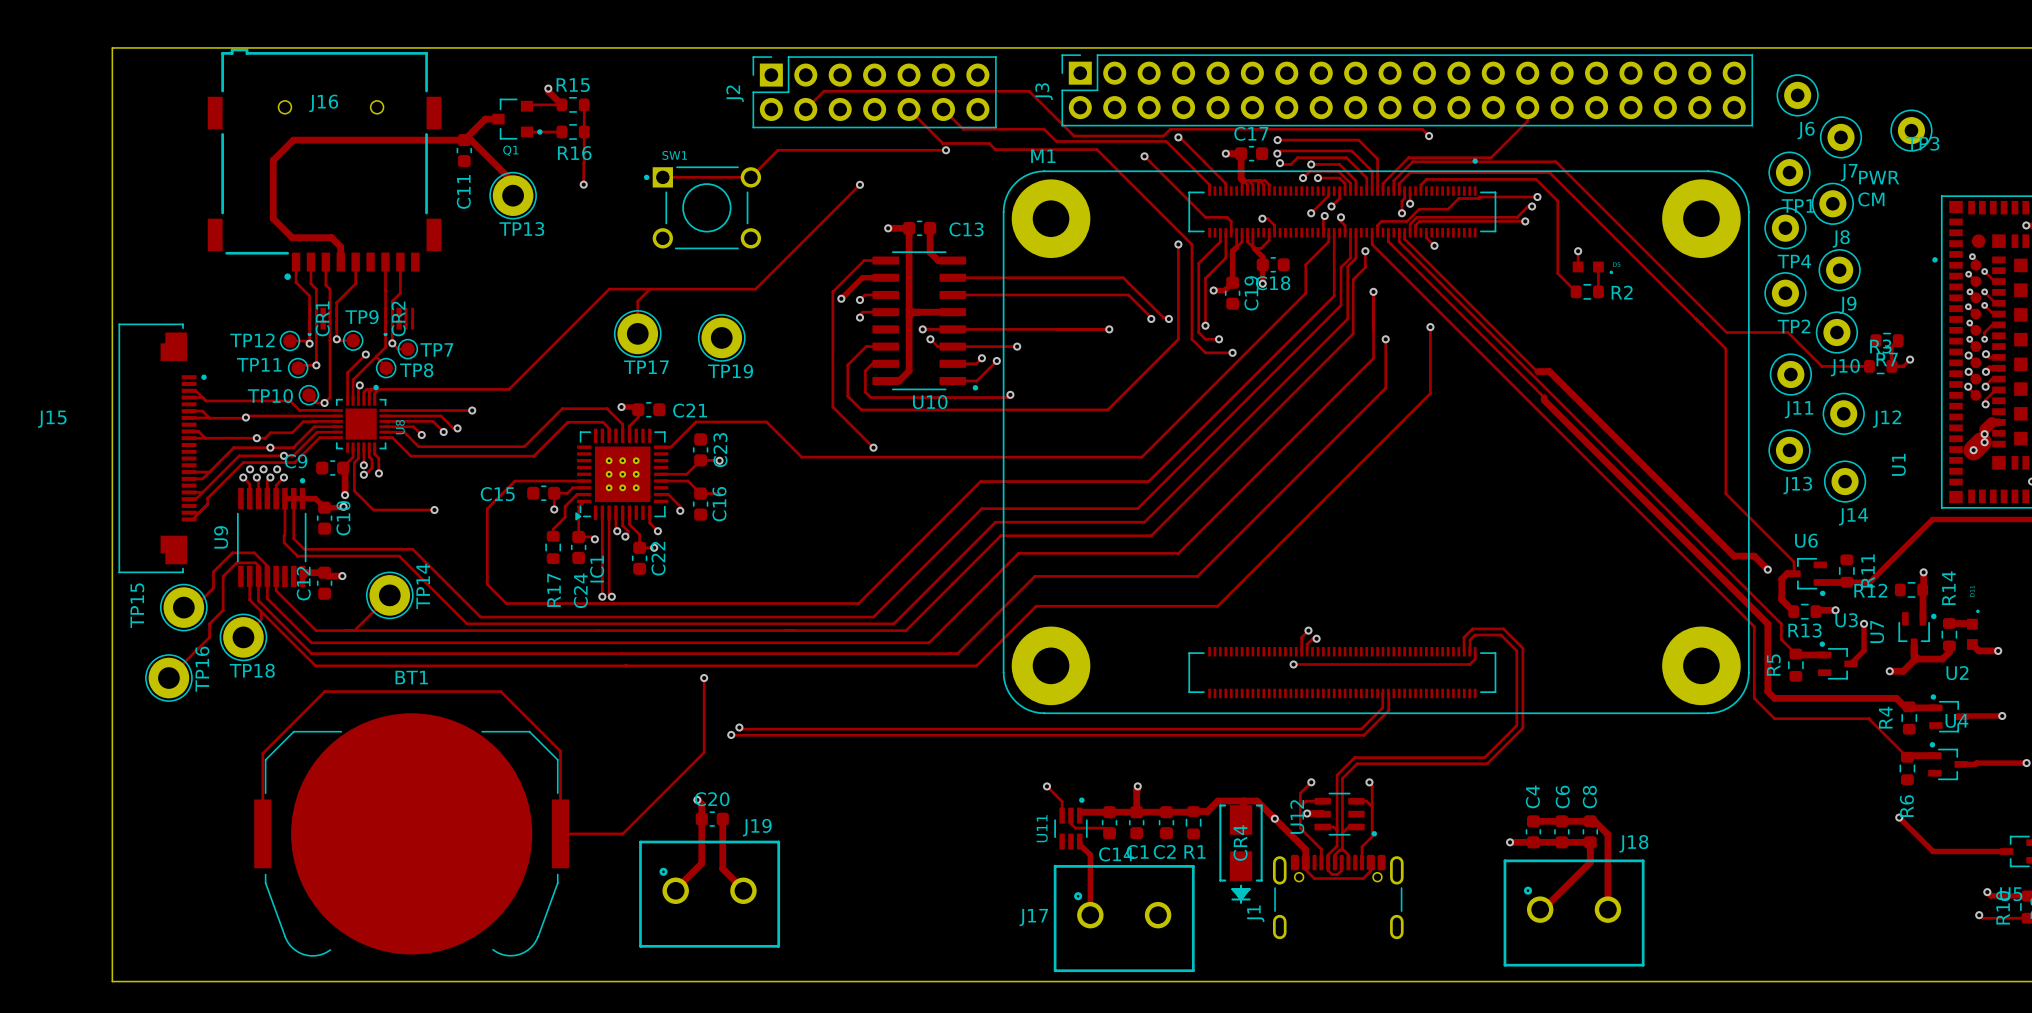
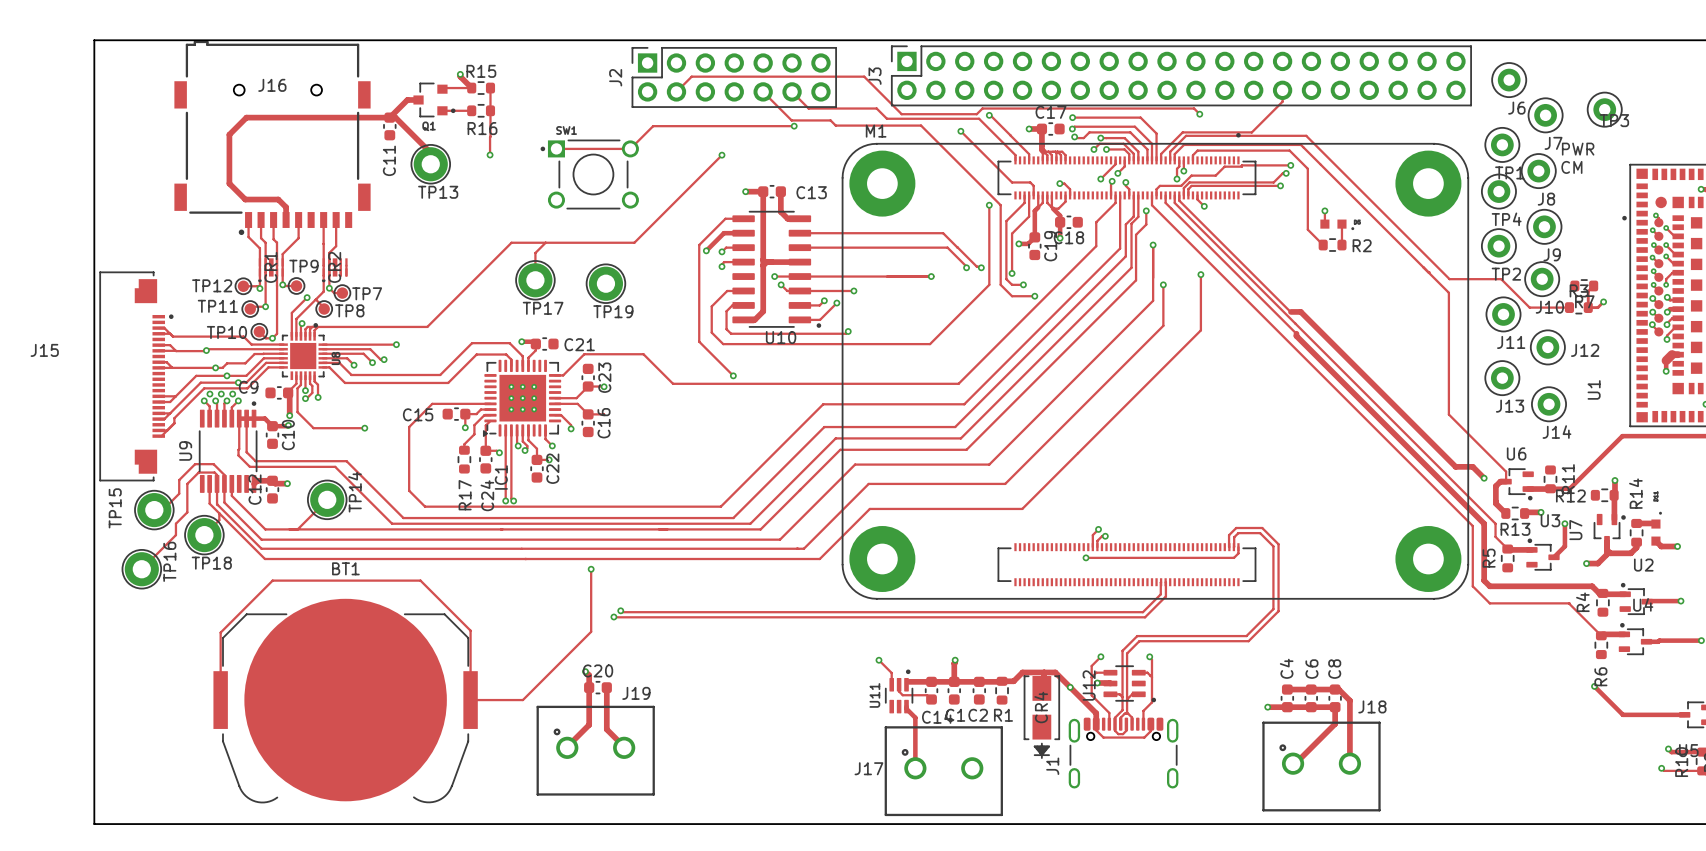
via: (1984, 434) -> none
track: (1984, 442) (1981, 442) (1973, 450) -> none
via: (1973, 450) -> none

